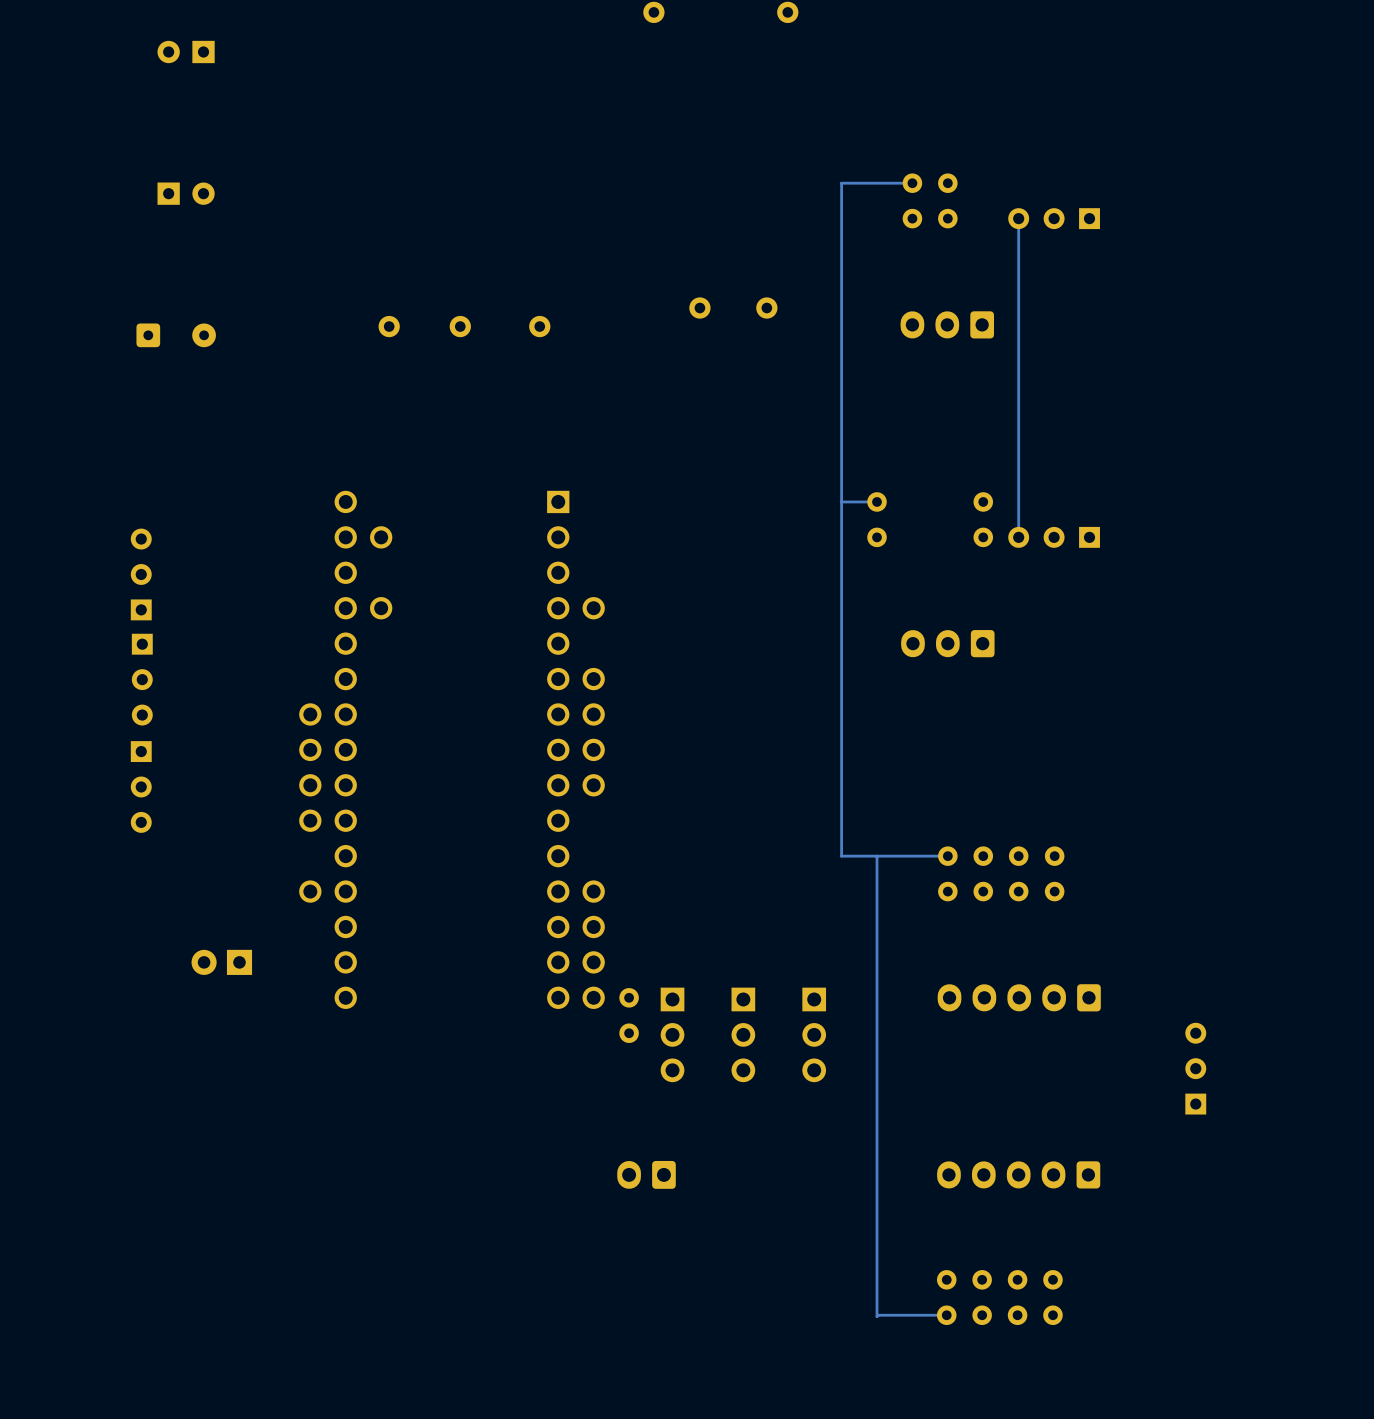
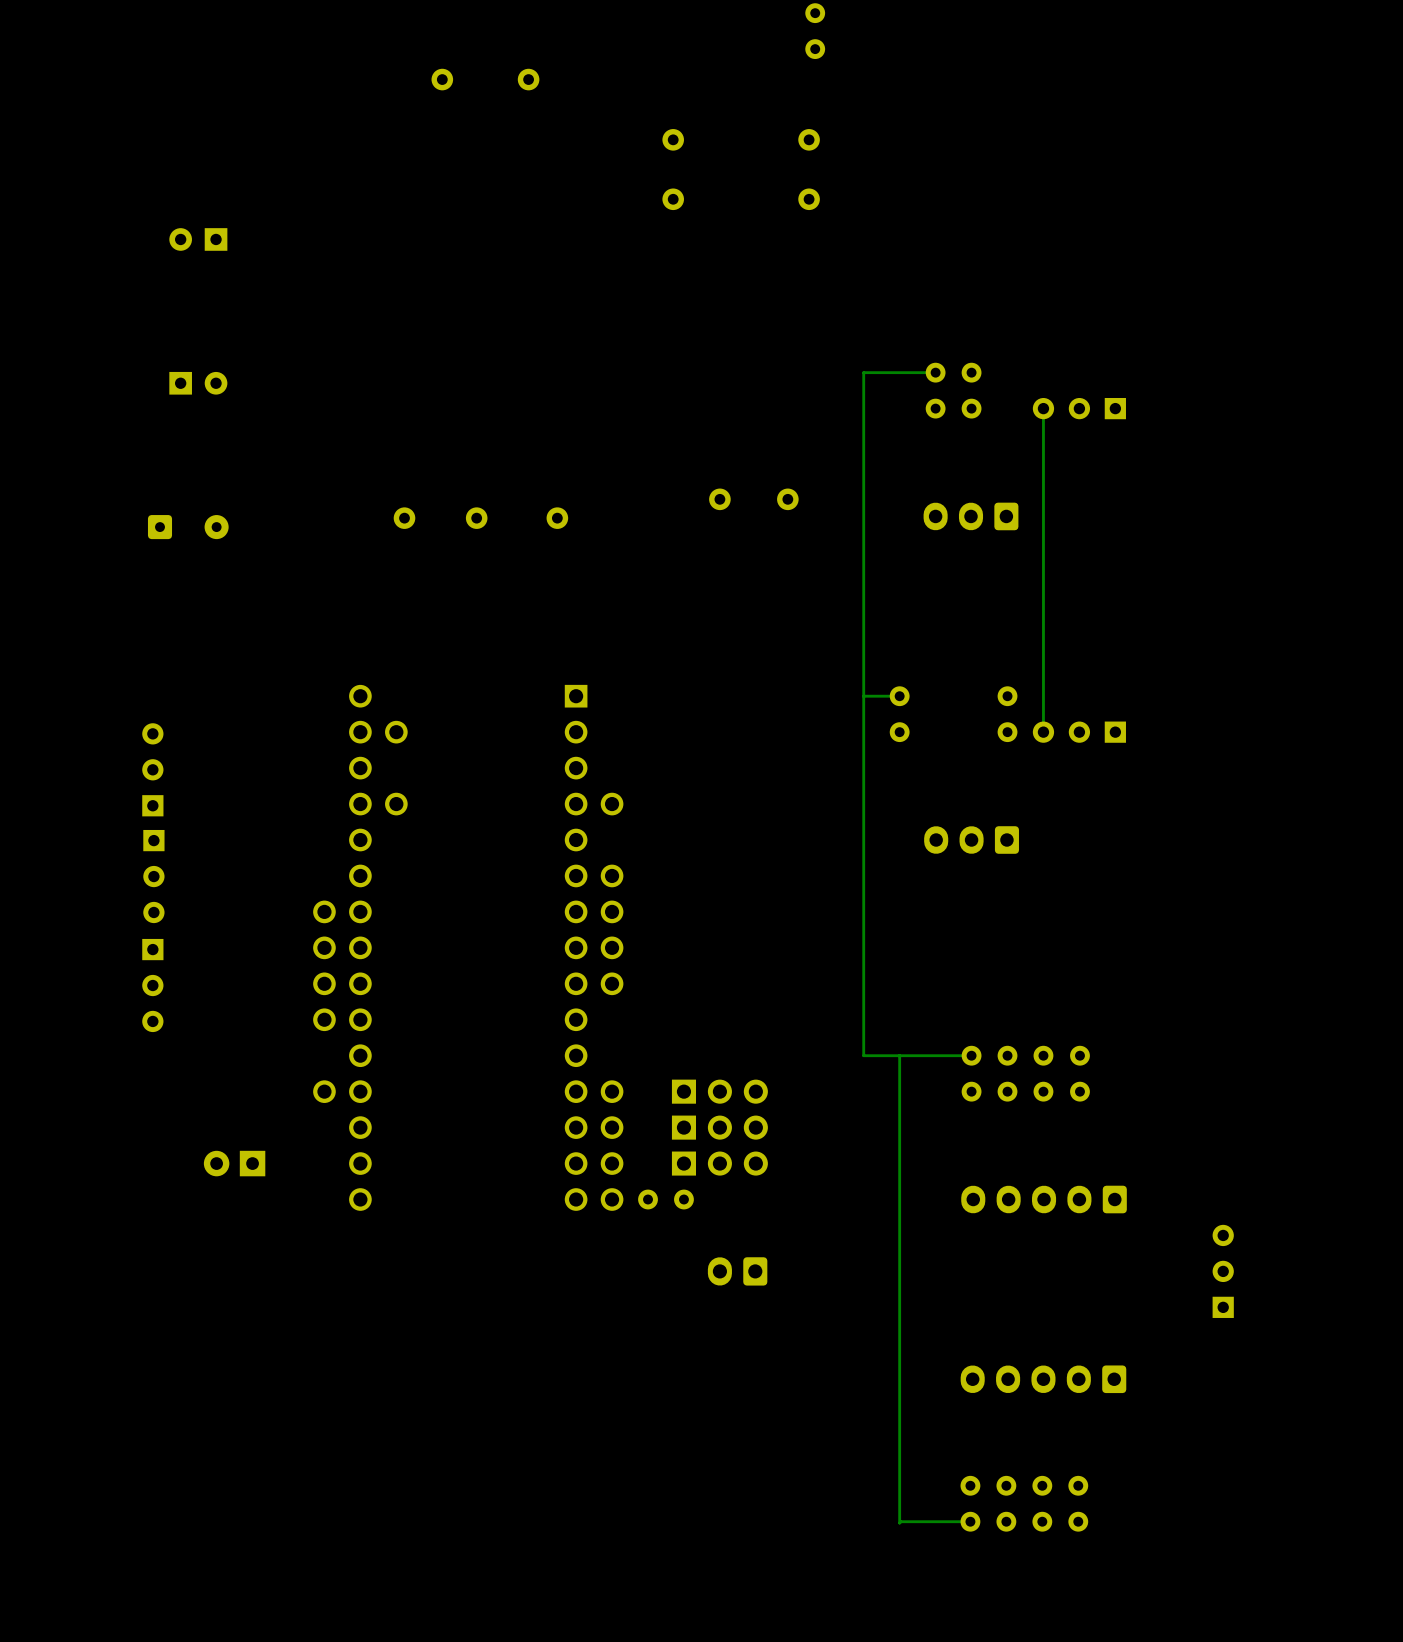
part: none -> (719, 1091)
part: none -> (719, 1127)
part: none -> (719, 1163)
part rotation: 0° (629, 1015) -> 90° clockwise (665, 1199)
part: (672, 1034) -> none
part: (743, 1034) -> none
part: (814, 1034) -> none
part position: (646, 1174) -> (737, 1271)

